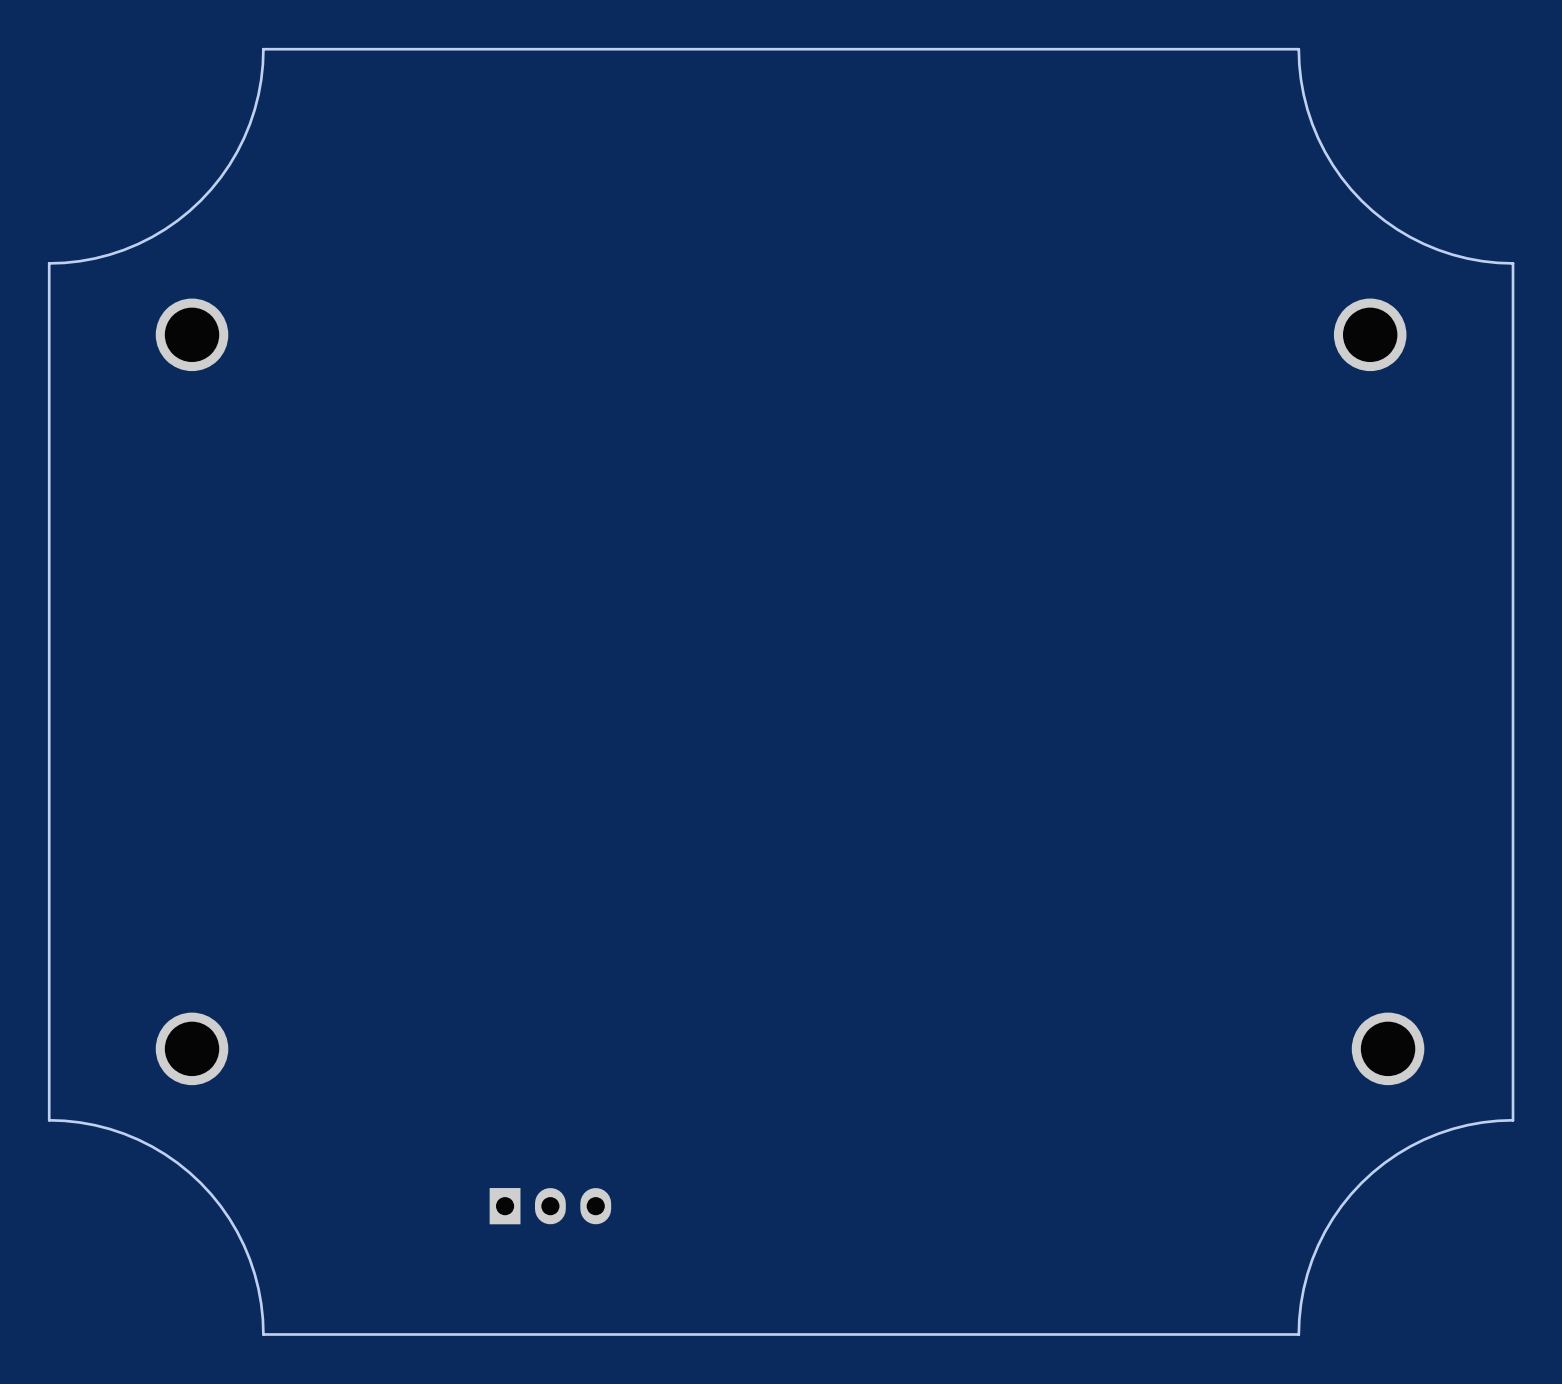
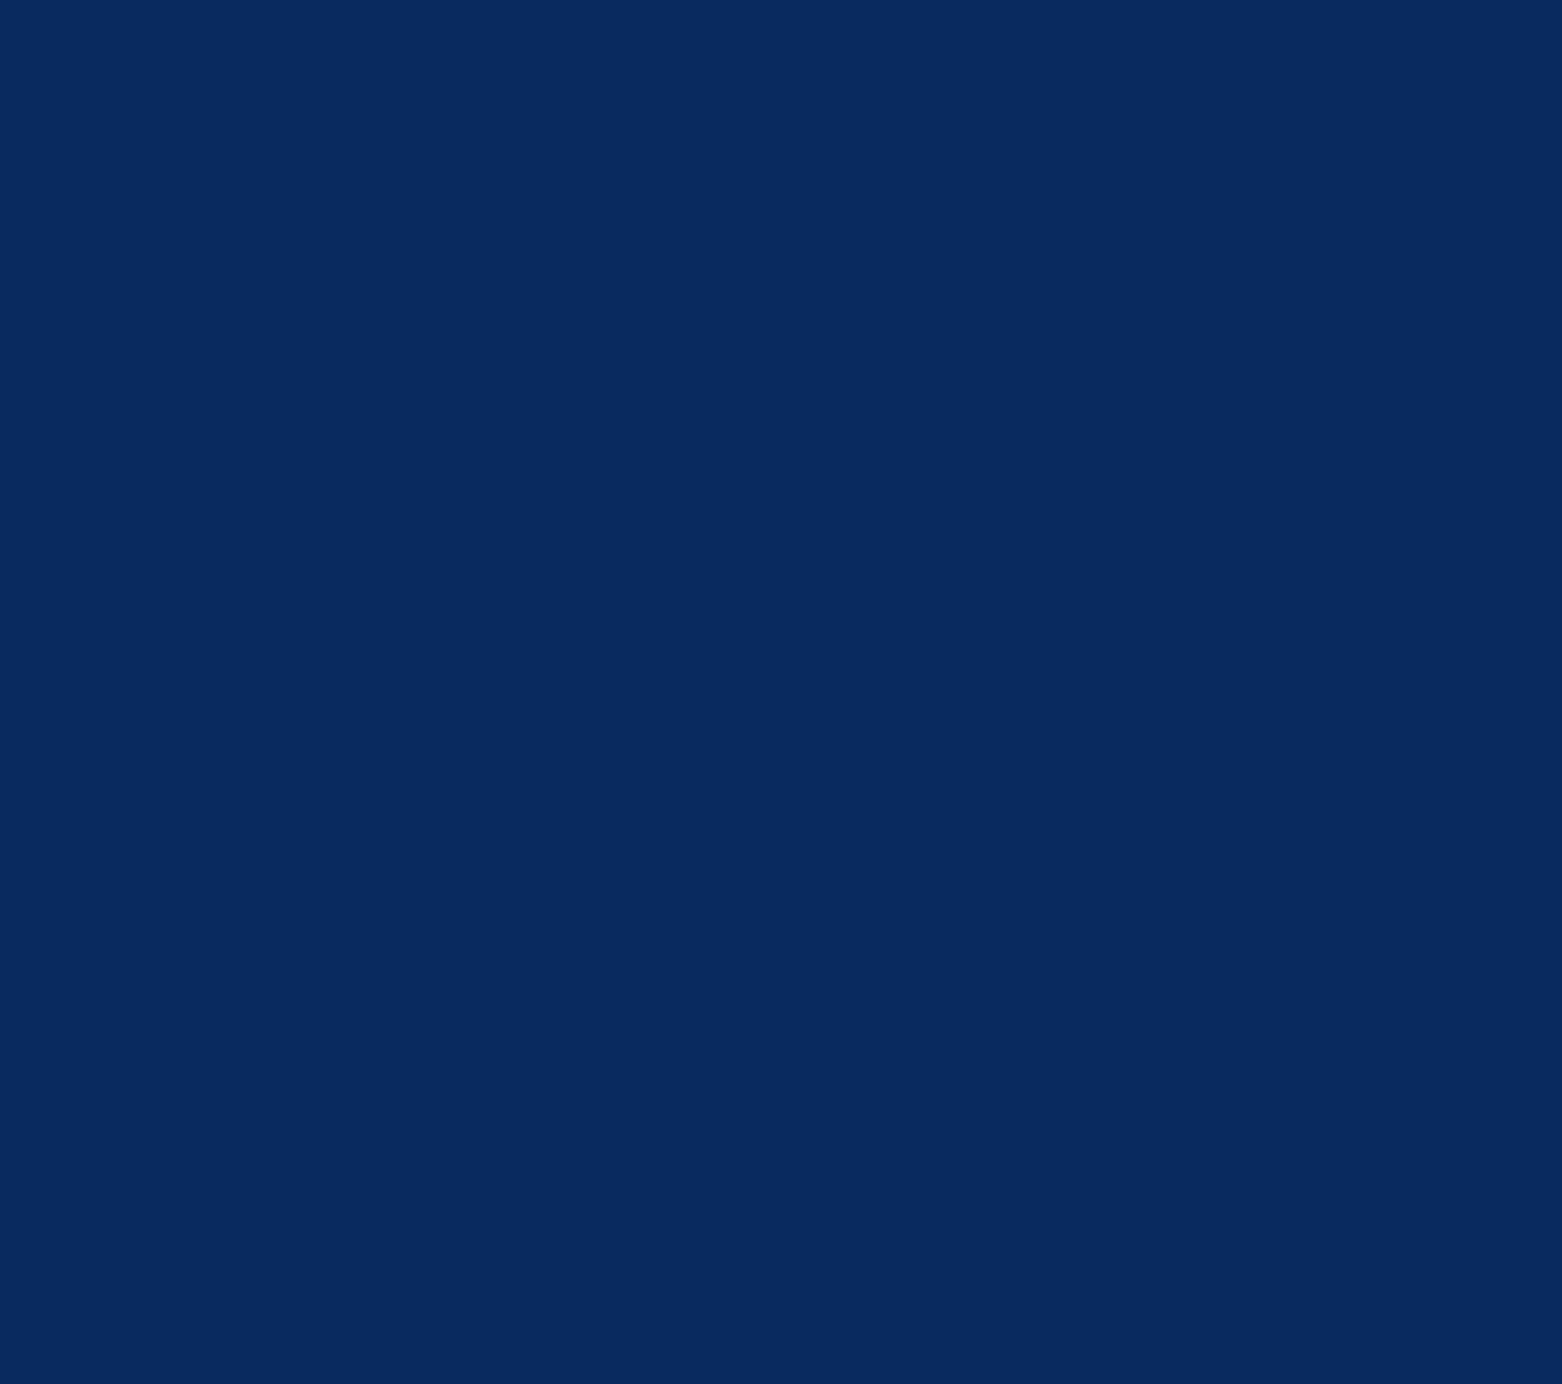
board edge: (1298, 49) (263, 49) (258, 94) (244, 138) (229, 165) (200, 200) (165, 229) (138, 244) (94, 258) (49, 263) (49, 1120) (94, 1125) (138, 1139) (165, 1154) (200, 1183) (229, 1218) (244, 1245) (258, 1288) (263, 1334) (1298, 1334) (1303, 1288) (1318, 1245) (1332, 1218) (1361, 1183) (1397, 1154) (1424, 1139) (1467, 1125) (1513, 1120) (1513, 263) (1467, 258) (1424, 244) (1384, 220) (1361, 200) (1332, 165) (1318, 138) (1303, 94) (1298, 49) -> none
part: (192, 334) -> none
part: (1370, 334) -> none
part: (192, 1048) -> none
part: (1388, 1048) -> none
part: (550, 1206) -> none

